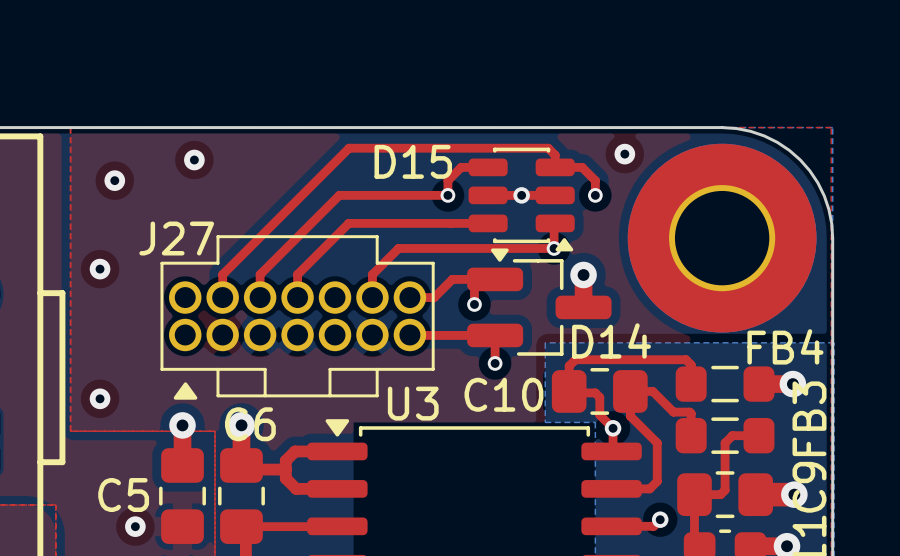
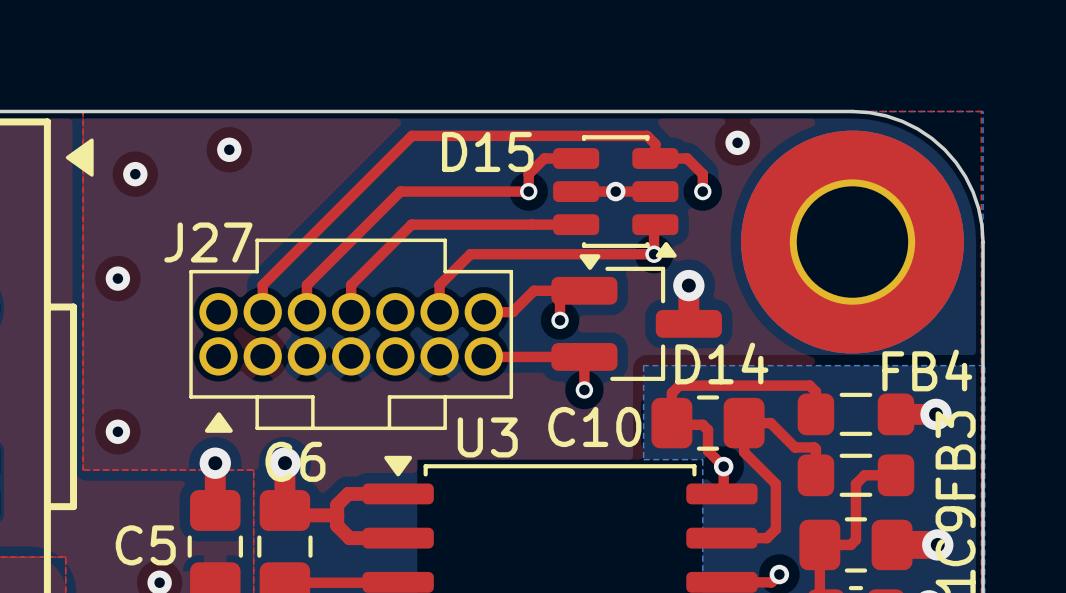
drawing: none -> [65, 138, 94, 177]

